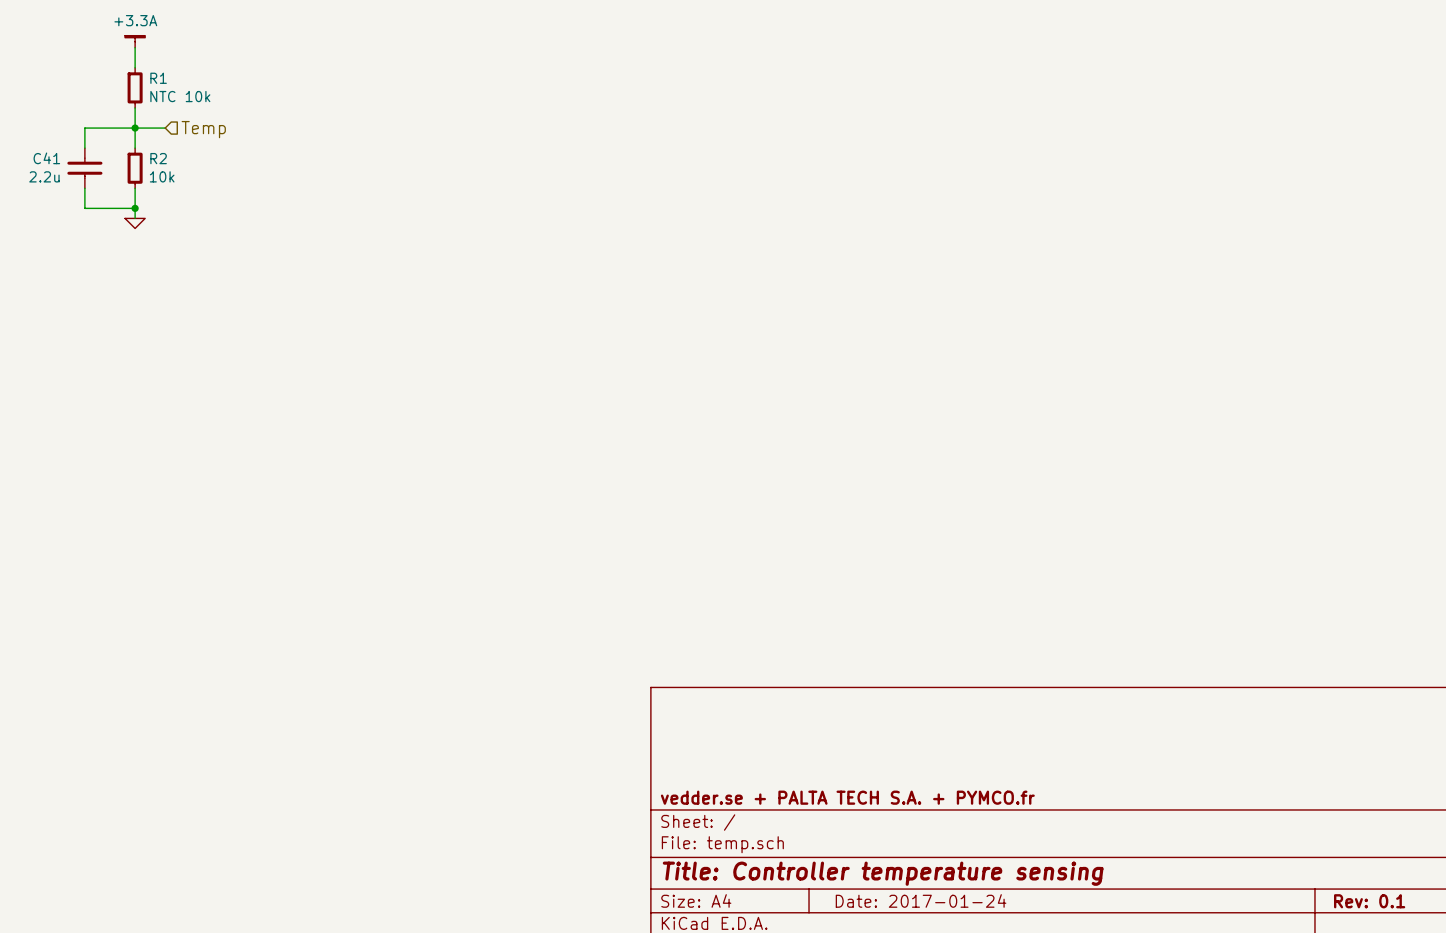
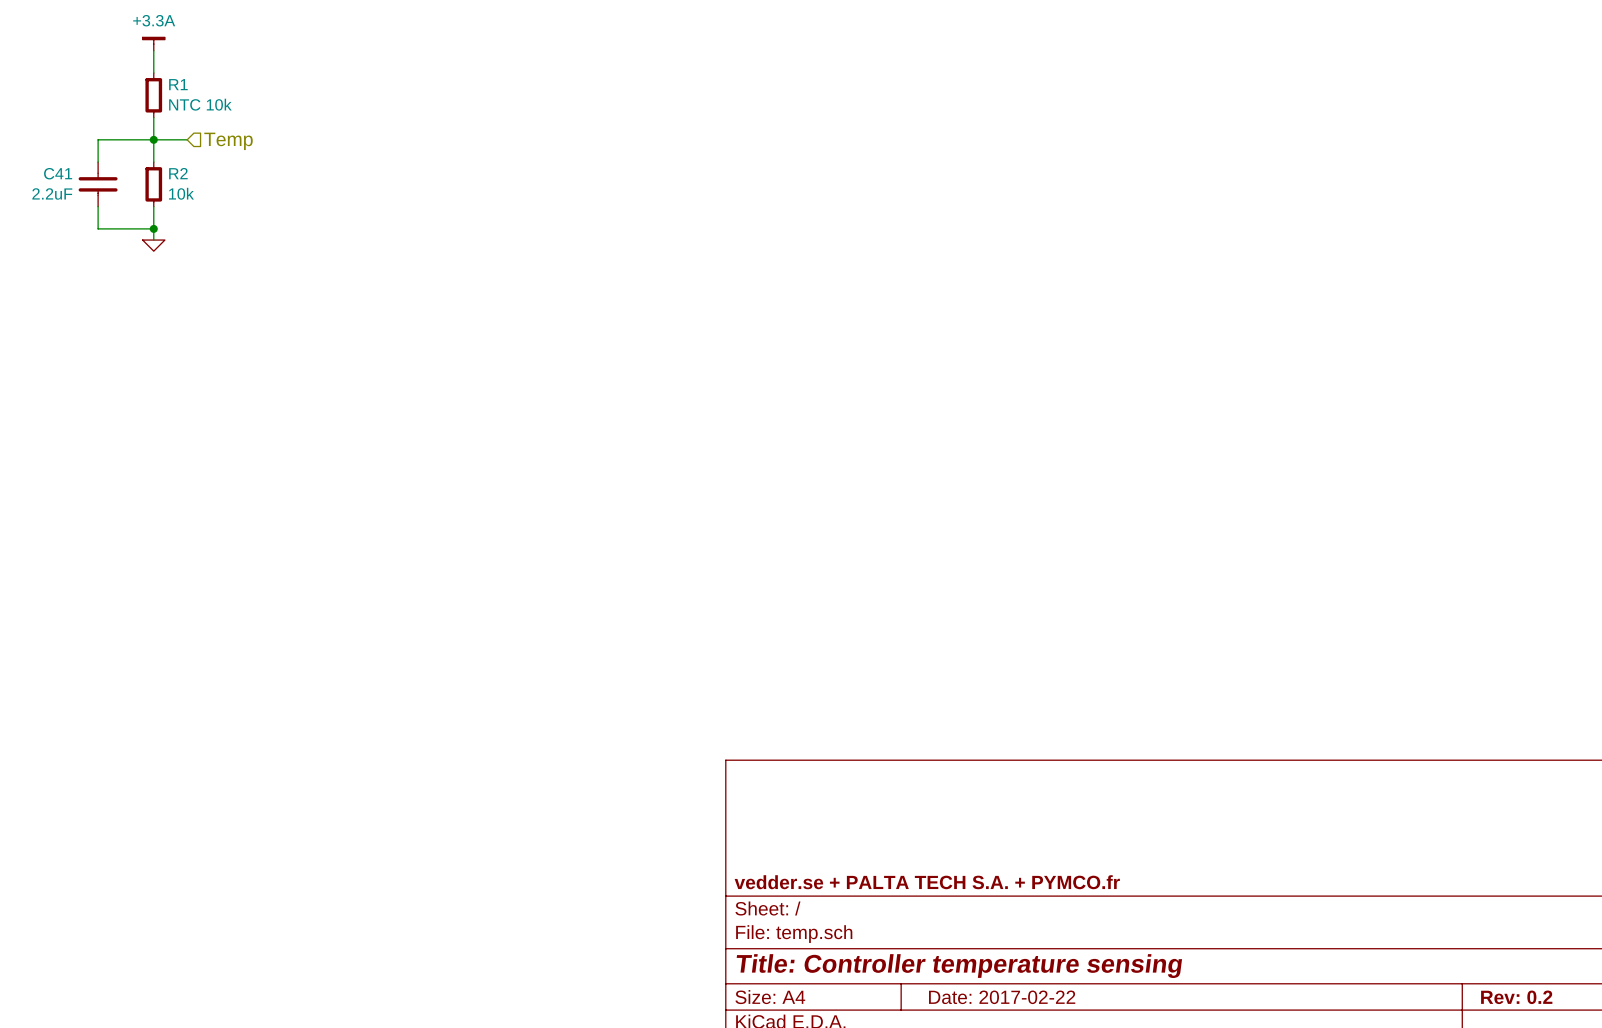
C41 value: 2.2u (44, 176) -> 2.2uF (52, 193)
title block: Date: 2017-01-24 (921, 900) -> Date: 2017-02-22 (1002, 997)
title block: Rev: 0.1 (1369, 901) -> Rev: 0.2 (1516, 997)

